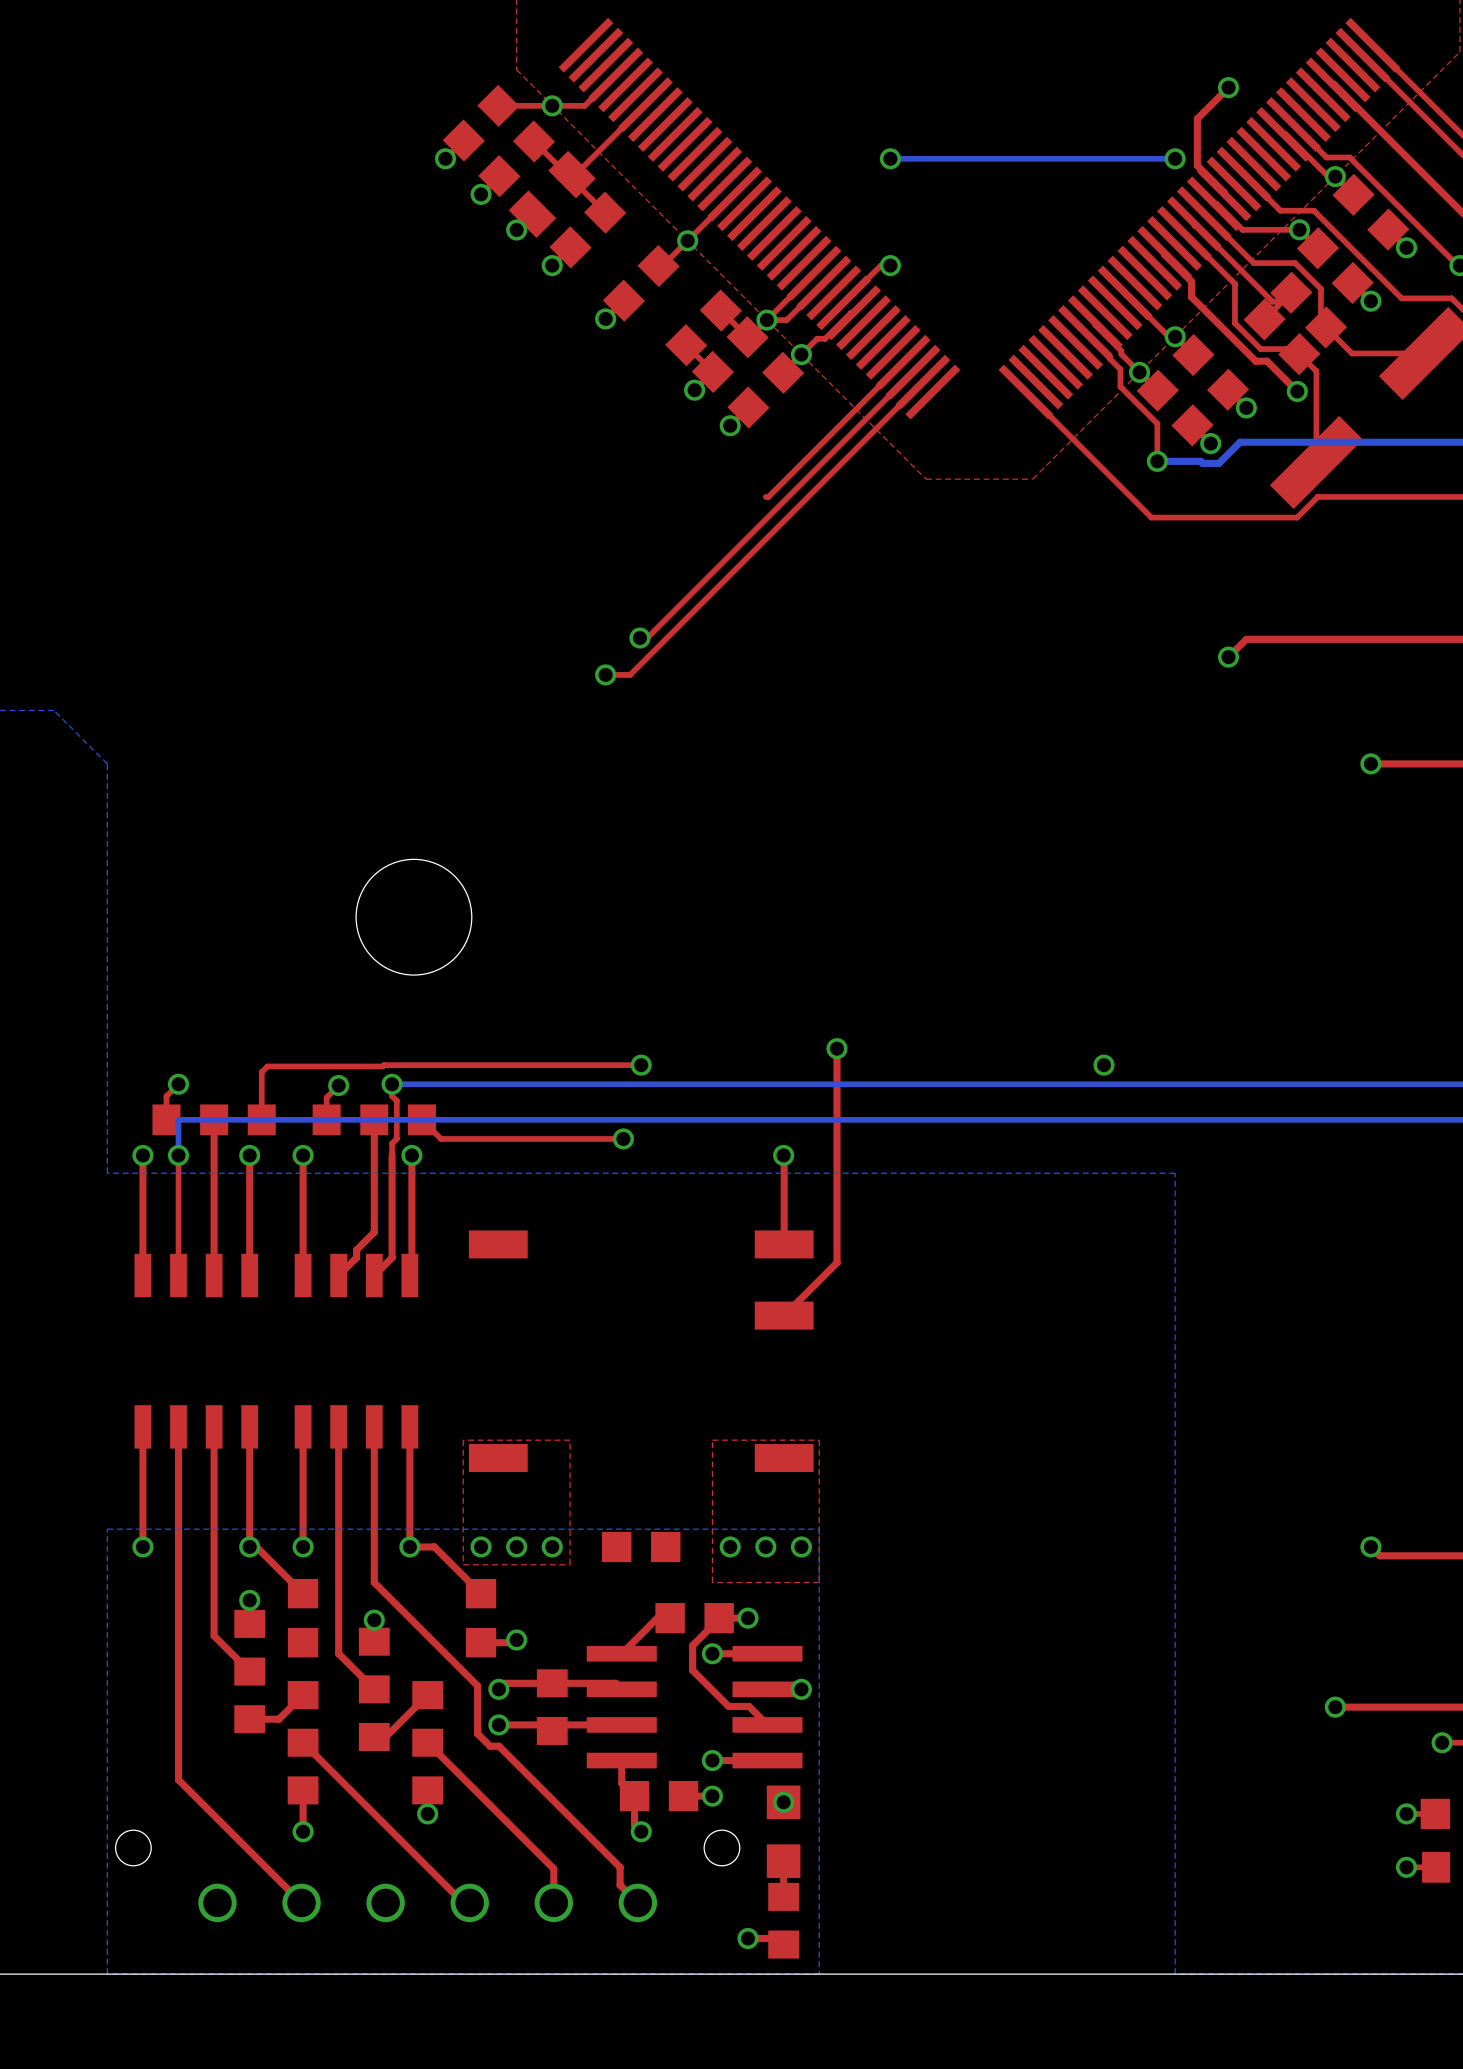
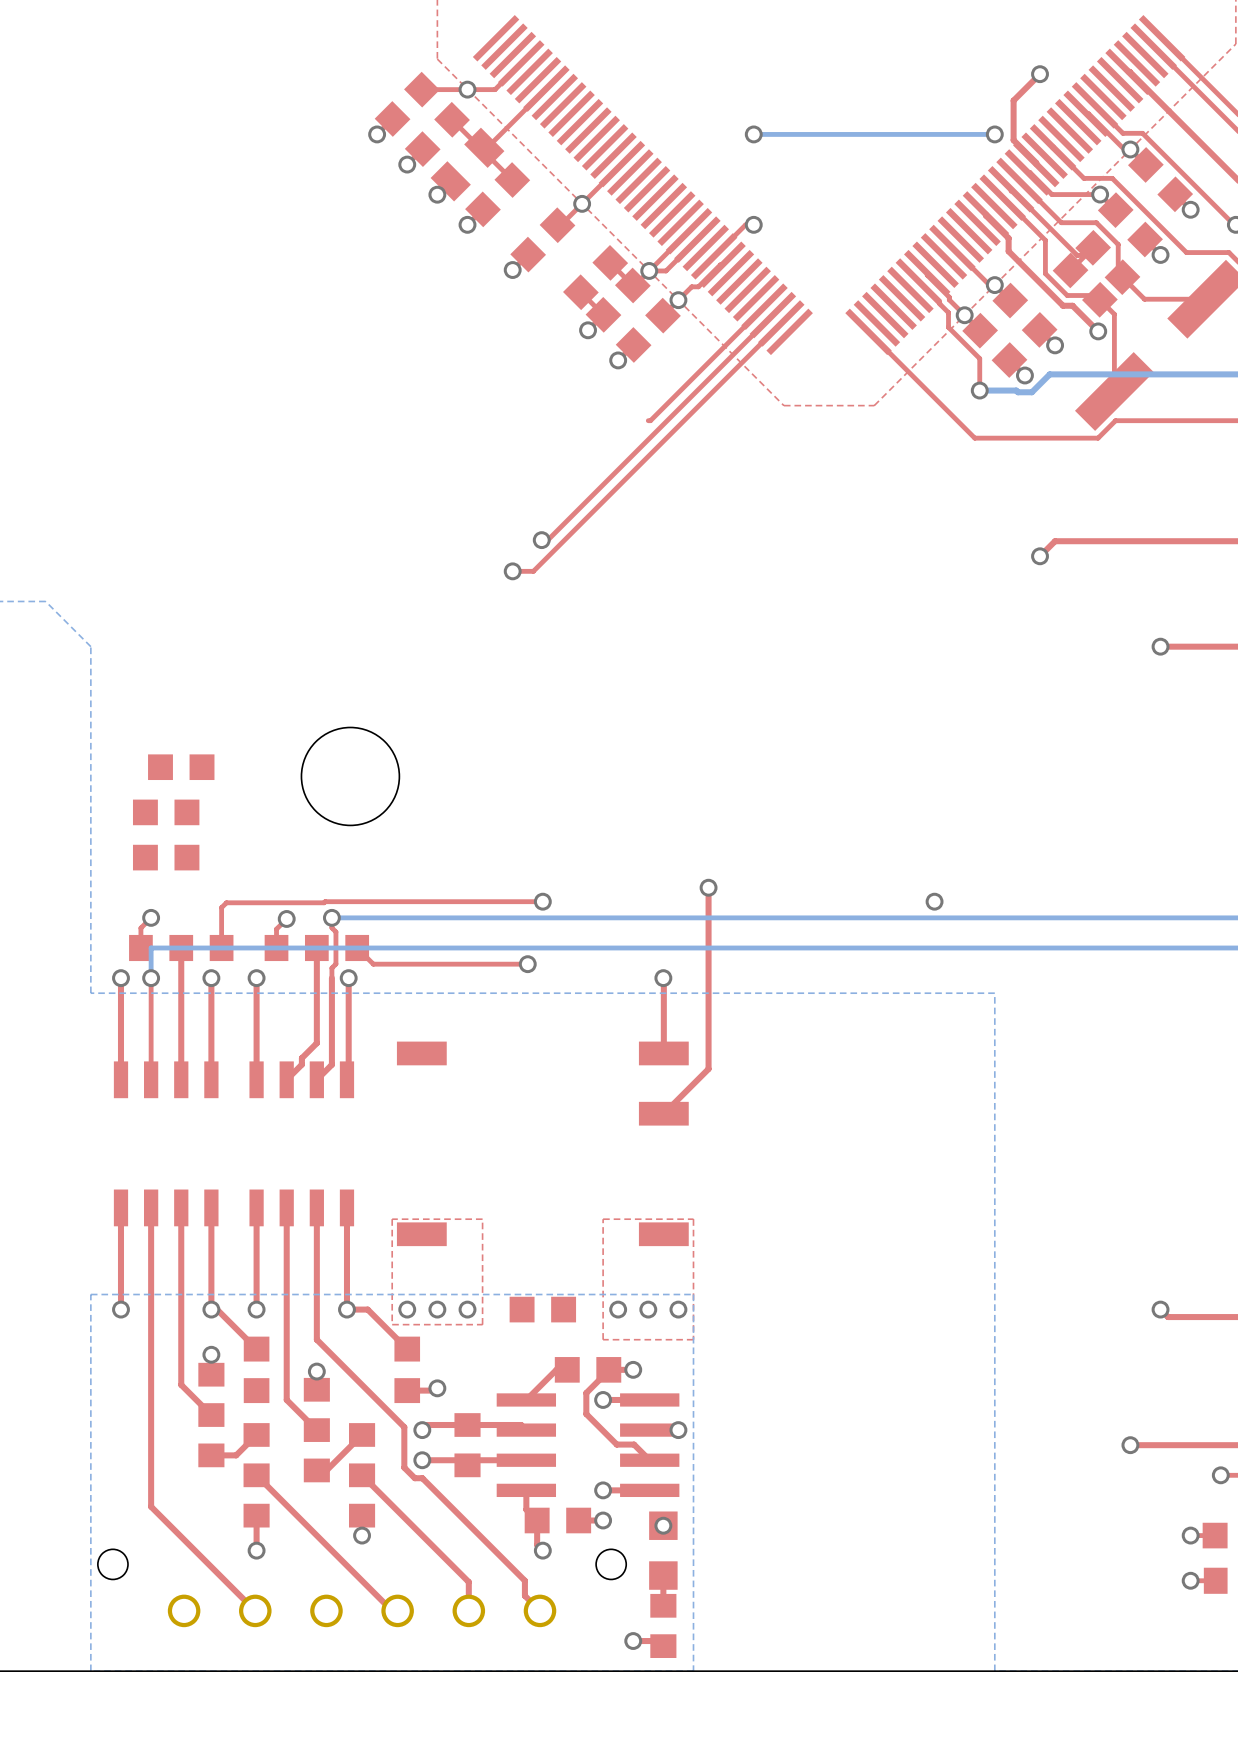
part: none -> (181, 767)
part: none -> (166, 812)
part: none -> (166, 857)

